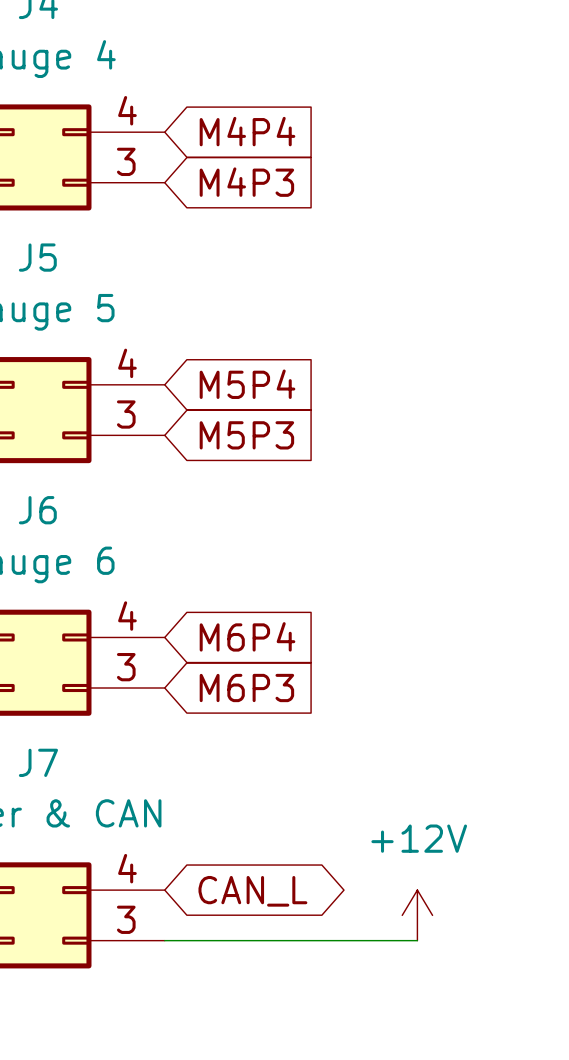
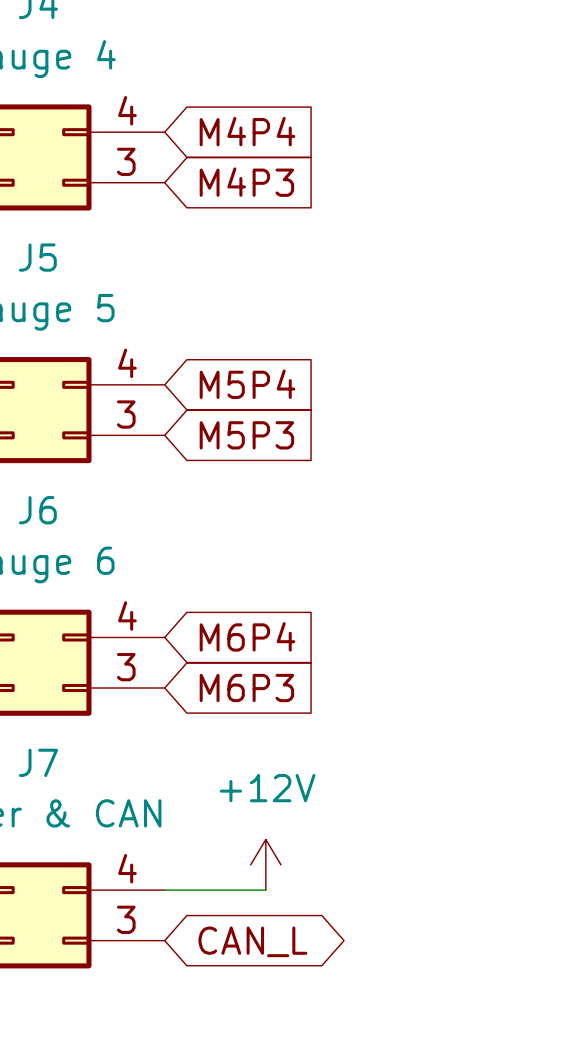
wire: none -> (164, 890) (265, 890)
global label position: CAN_L (252, 891) -> CAN_L (252, 941)
power symbol position: +12V (417, 915) -> +12V (265, 864)
wire: (164, 940) (417, 940) -> none

